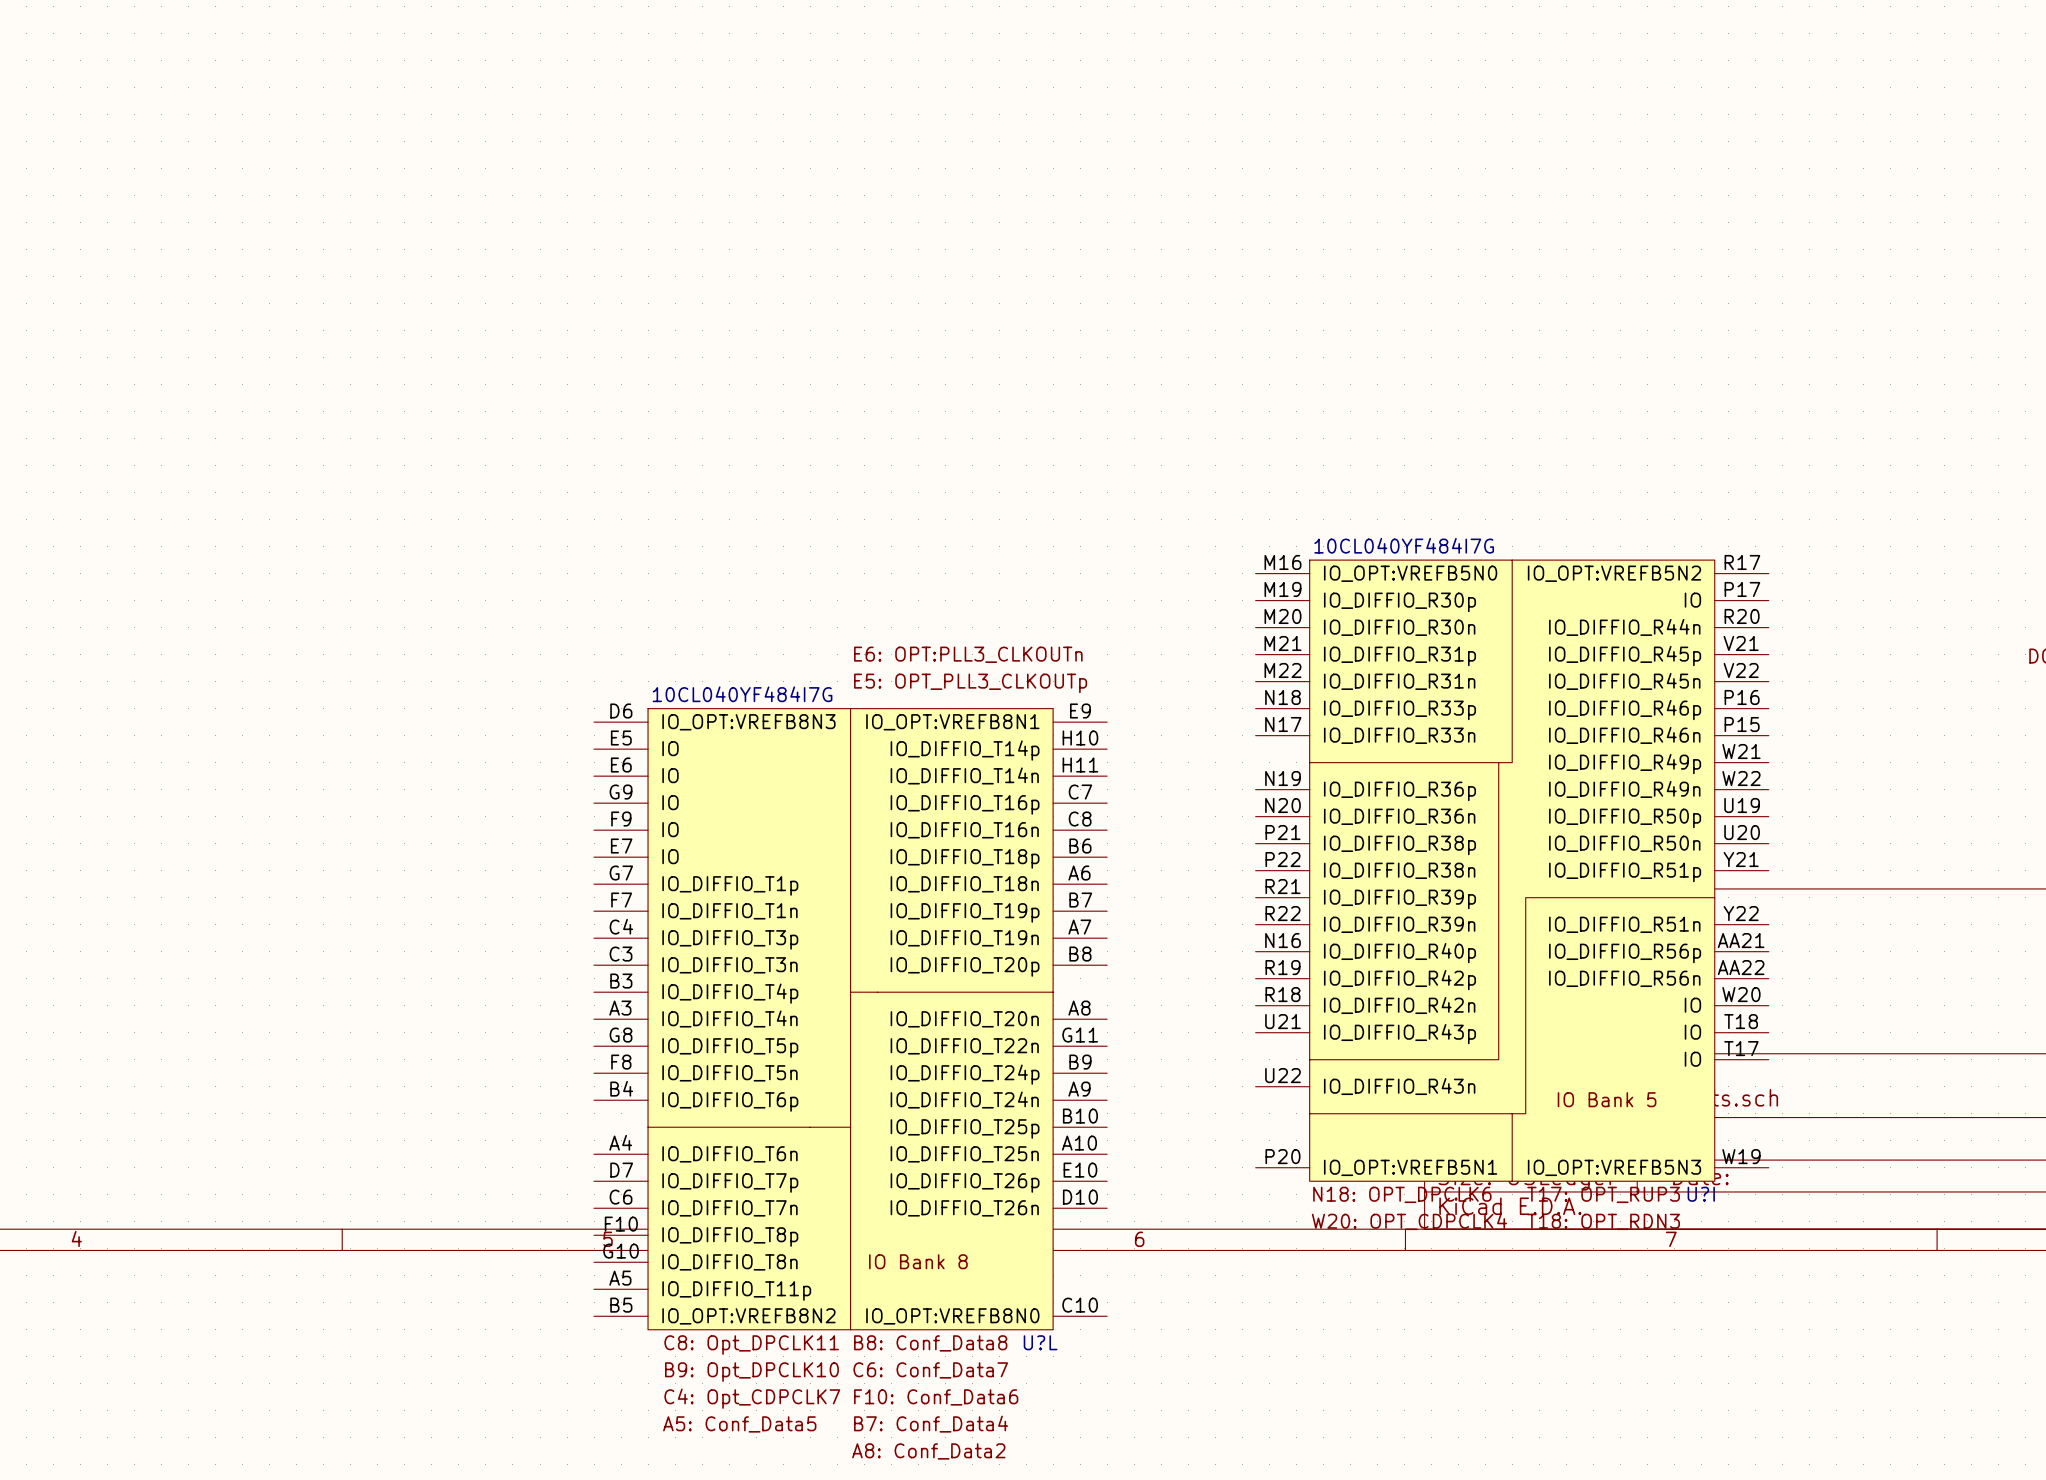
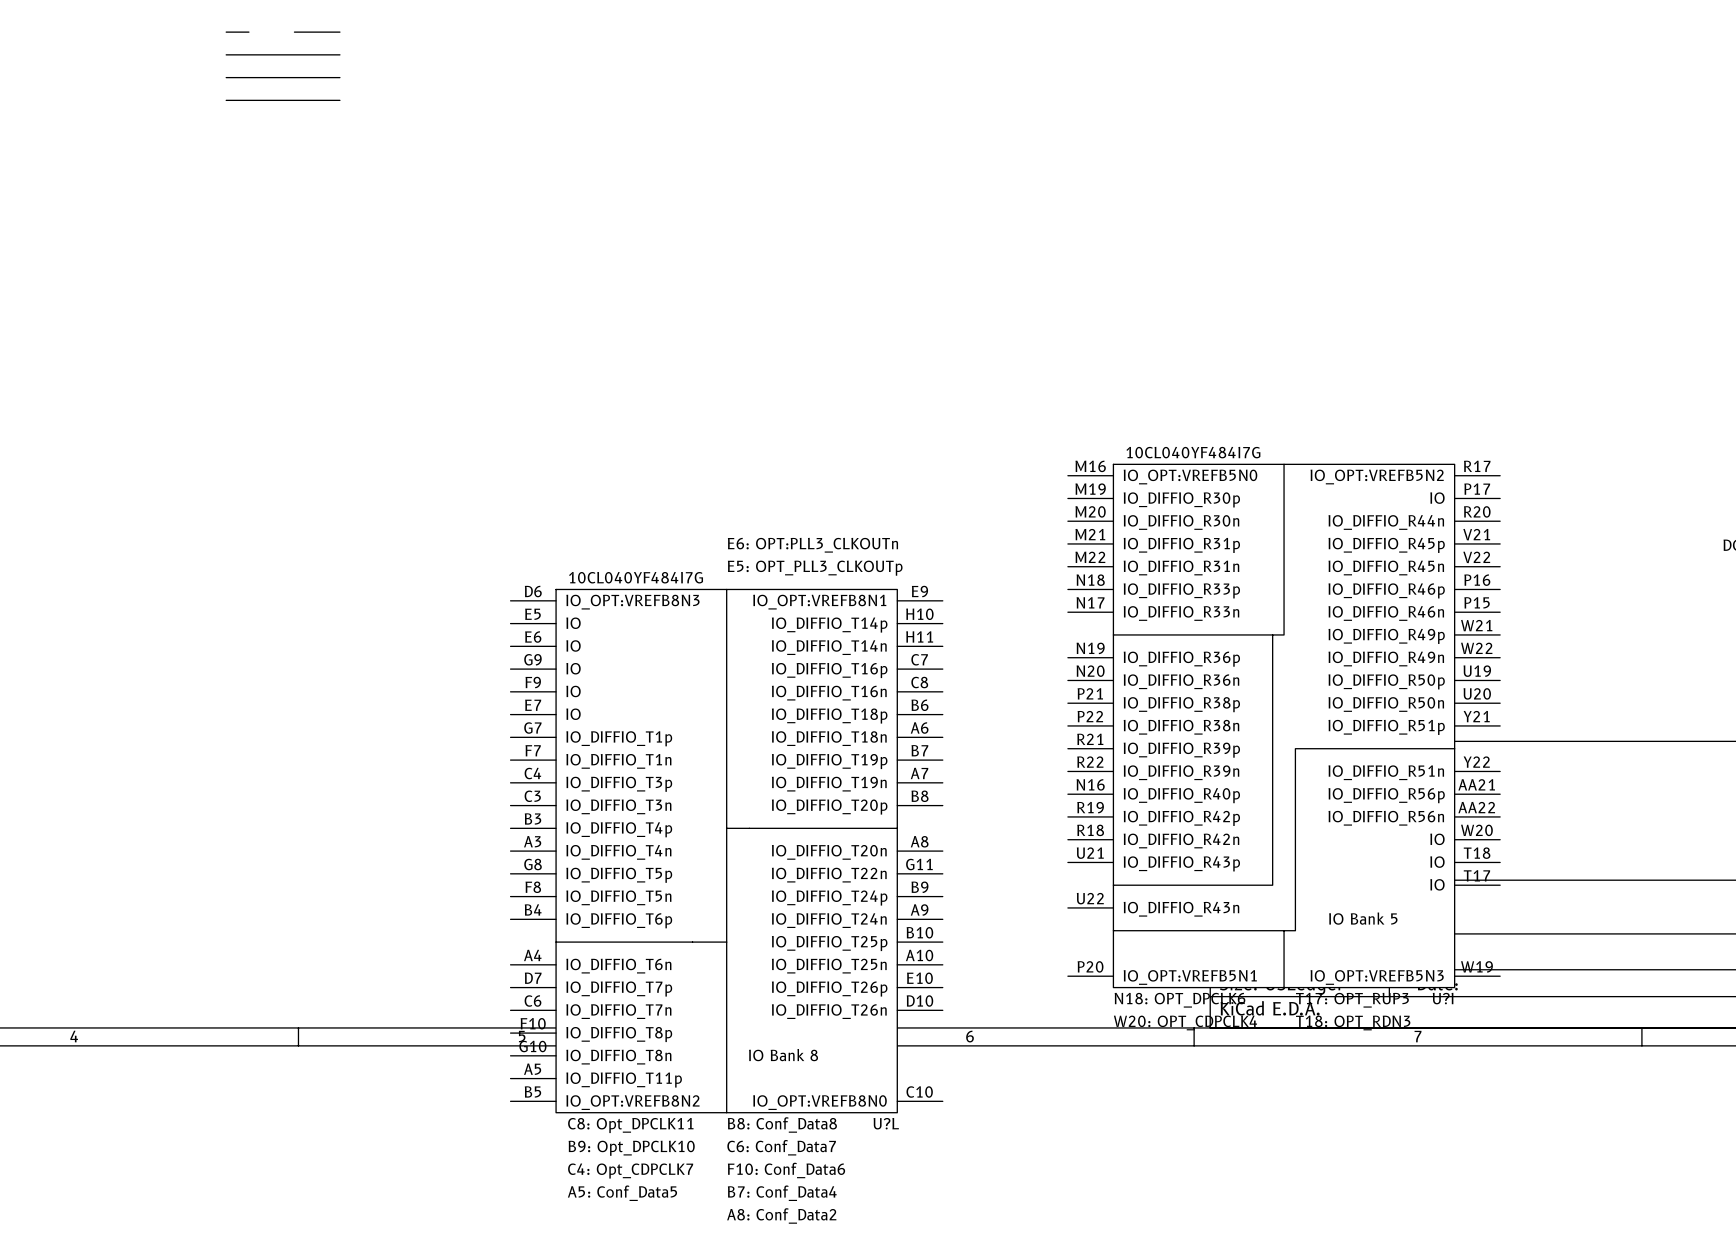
wire: none -> (226, 32) (248, 32)
wire: none -> (294, 32) (339, 32)
wire: none -> (226, 54) (339, 54)
wire: none -> (226, 77) (339, 77)
wire: none -> (226, 100) (339, 100)

